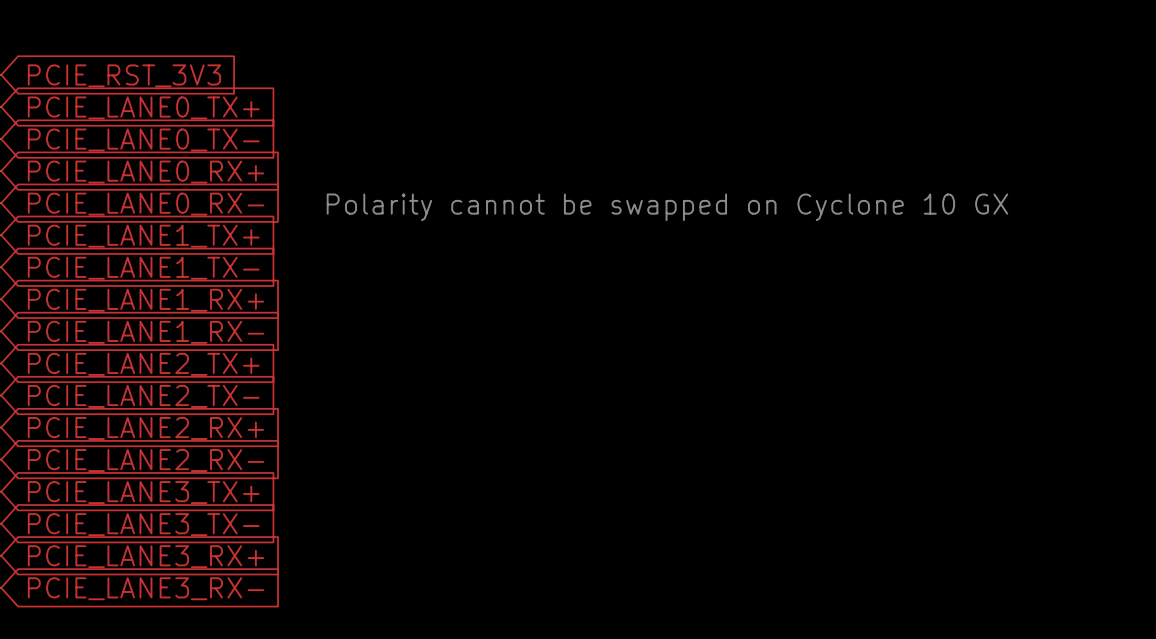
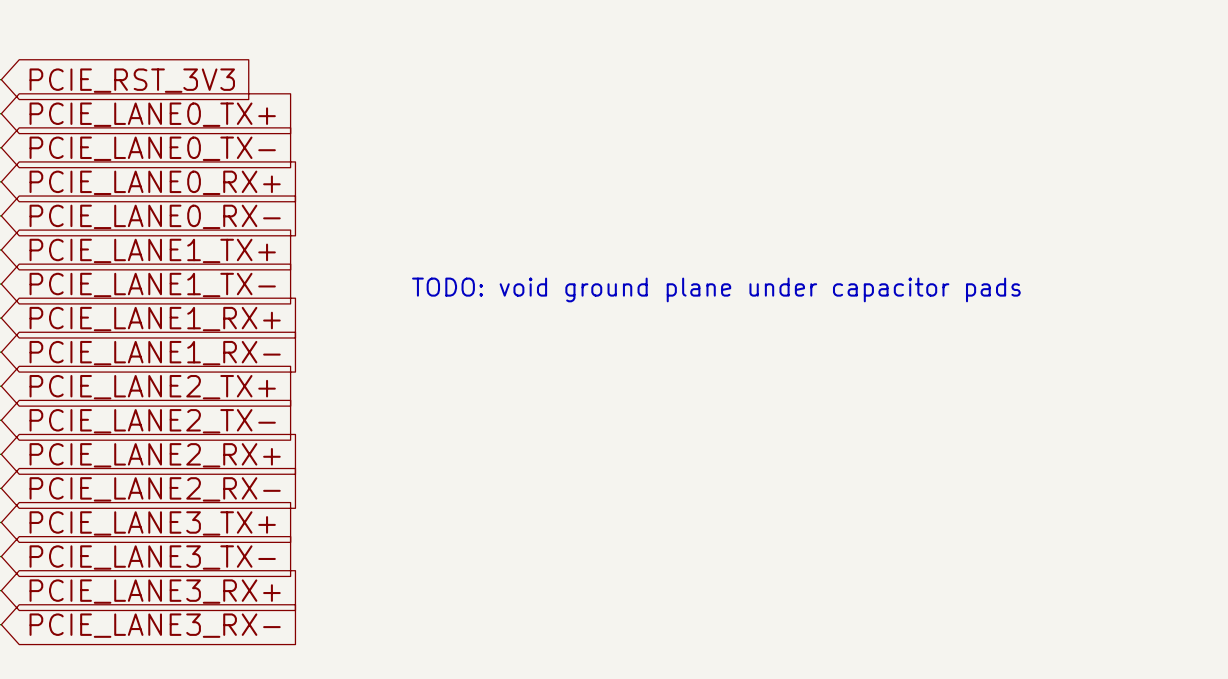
text: Polarity cannot be swapped on Cyclone 10 GX (667, 207) -> none
text: none -> TODO: void ground plane under capacitor pads (716, 289)

